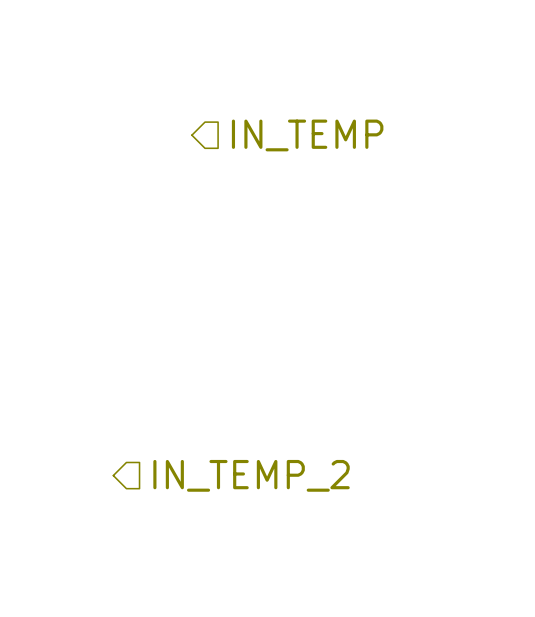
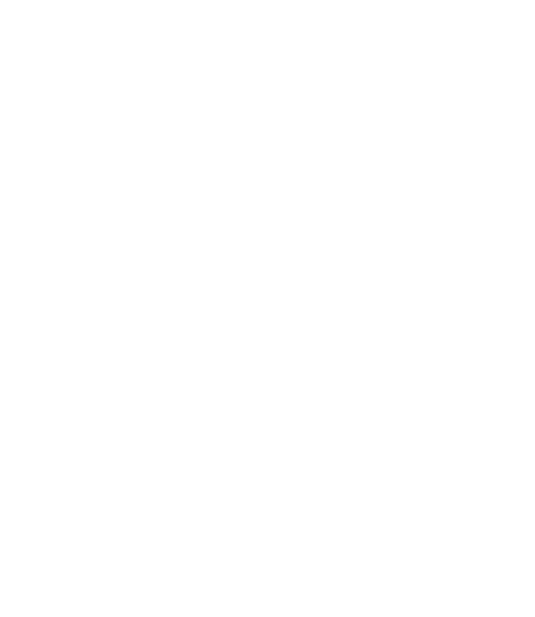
hierarchical label: IN_TEMP (307, 135) -> none
hierarchical label: IN_TEMP_2 (251, 475) -> none

